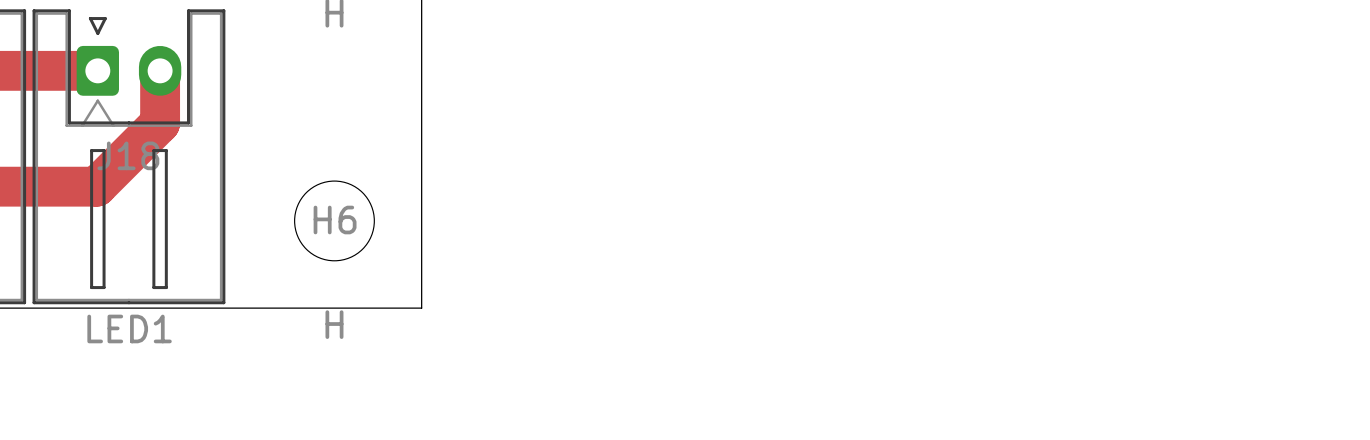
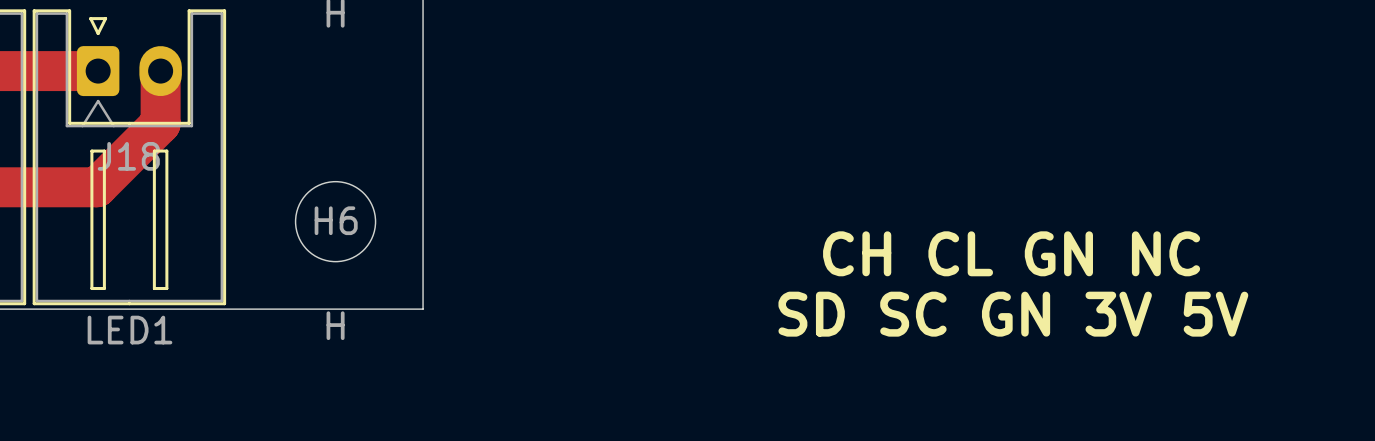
text: none -> CH CL GN NC (1011, 253)
text: none -> SD SC GN 3V 5V (1013, 314)

